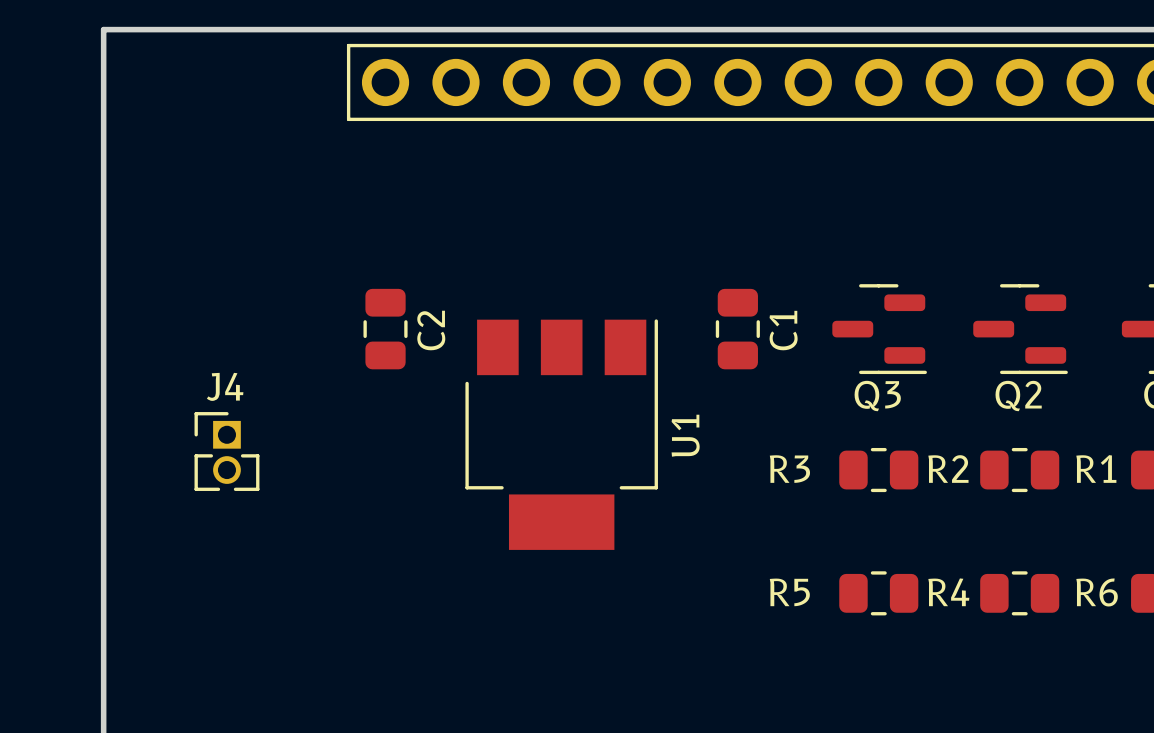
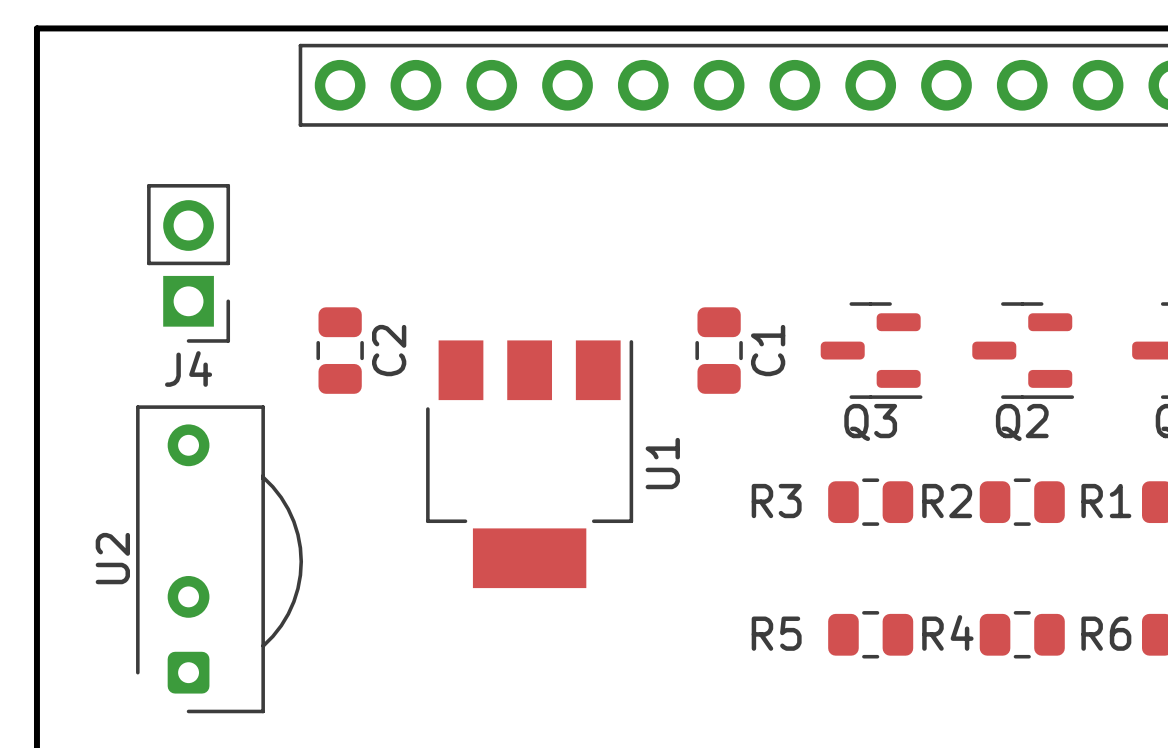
J4 name position: J4 (225, 386) -> J4 (188, 368)
J4 footprint: [194, 412, 260, 491] -> [147, 184, 231, 343]
U2: none -> (219, 559)

